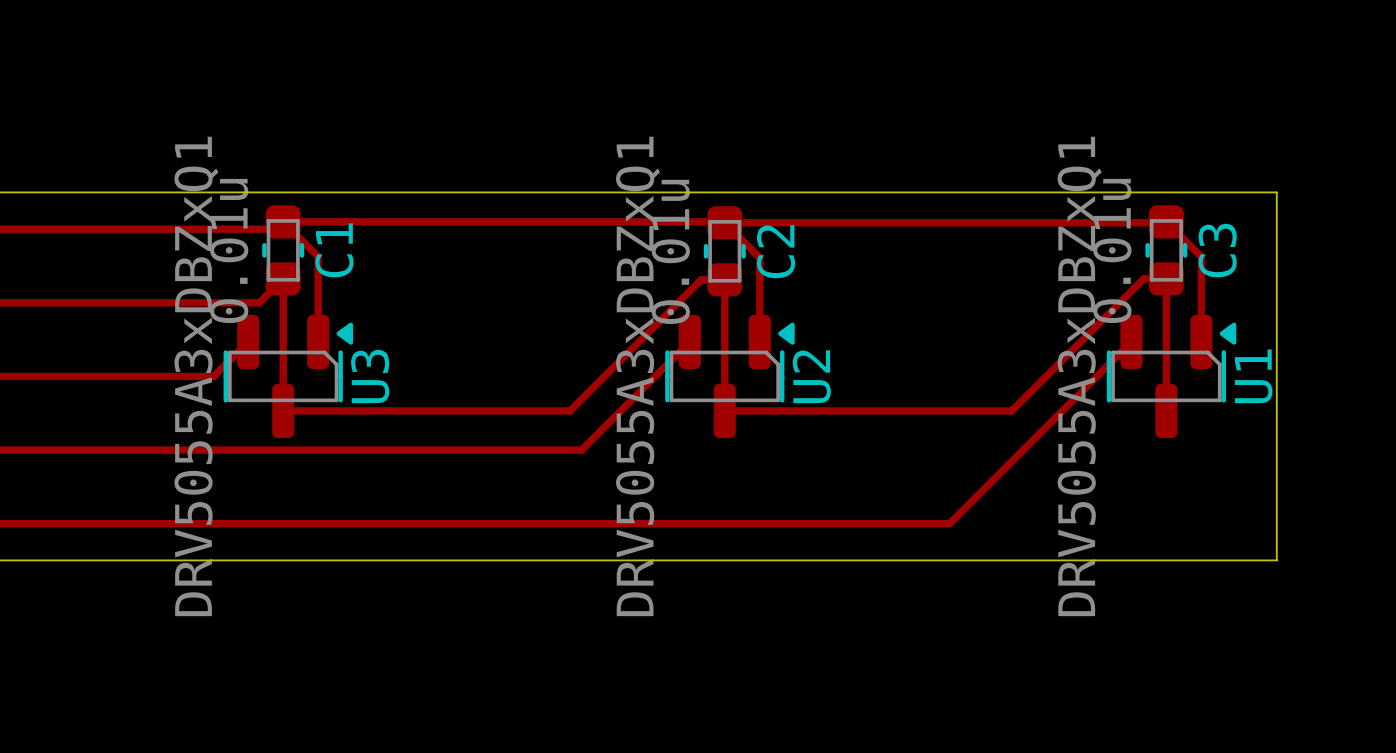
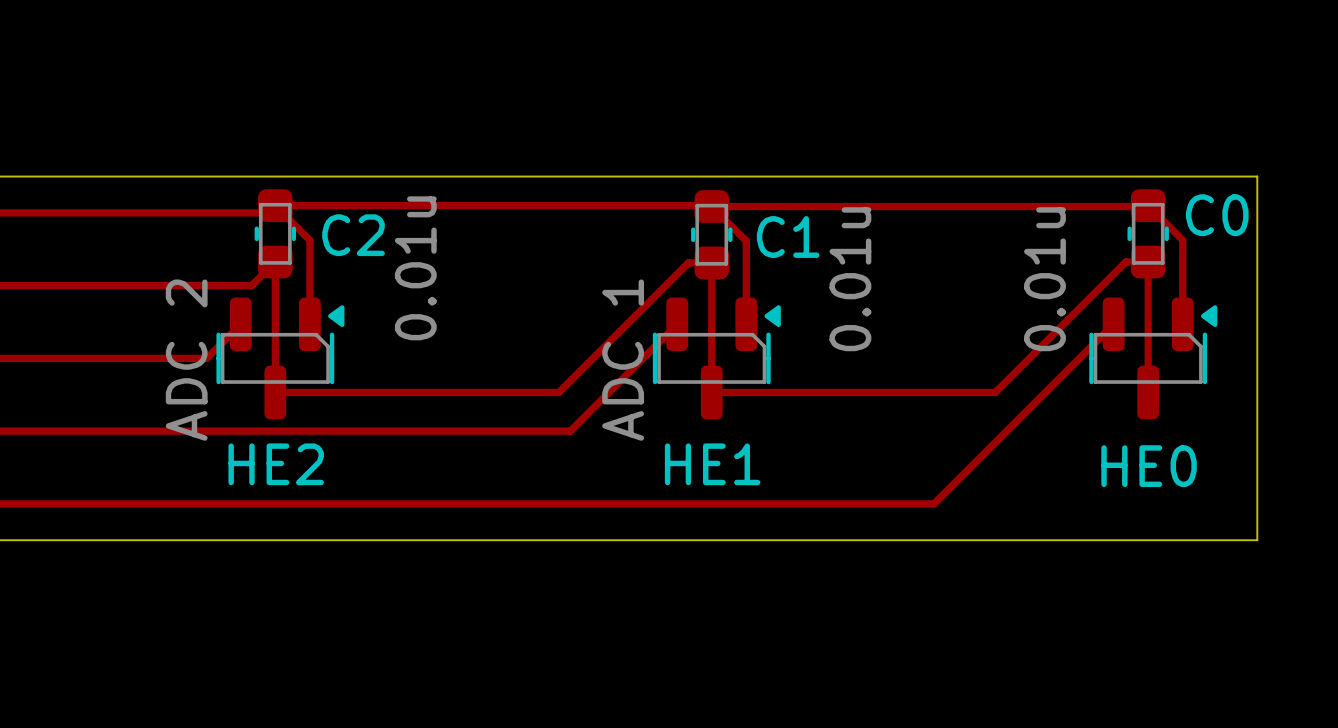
C1 value position: 0.01u (229, 250) -> 0.01u (415, 268)
C1 name: C1 (334, 250) -> C2 (353, 235)
C3 value position: 0.01u (1112, 250) -> 0.01u (1044, 279)
C3 name: C3 (1217, 250) -> C0 (1217, 215)
C2 value position: 0.01u (670, 251) -> 0.01u (850, 279)
C2 name: C2 (776, 251) -> C1 (788, 237)
U3 value: DRV5055A3xDBZxQ1 (196, 376) -> ADC 2 (186, 360)
U3 name: U3 (370, 376) -> HE2 (276, 464)
U2 value: DRV5055A3xDBZxQ1 (638, 376) -> ADC 1 (623, 360)
U2 name: U2 (811, 376) -> HE1 (712, 464)
U1 value: DRV5055A3xDBZxQ1 (1079, 376) -> none
U1 name: U1 (1253, 376) -> HE0 (1149, 466)

